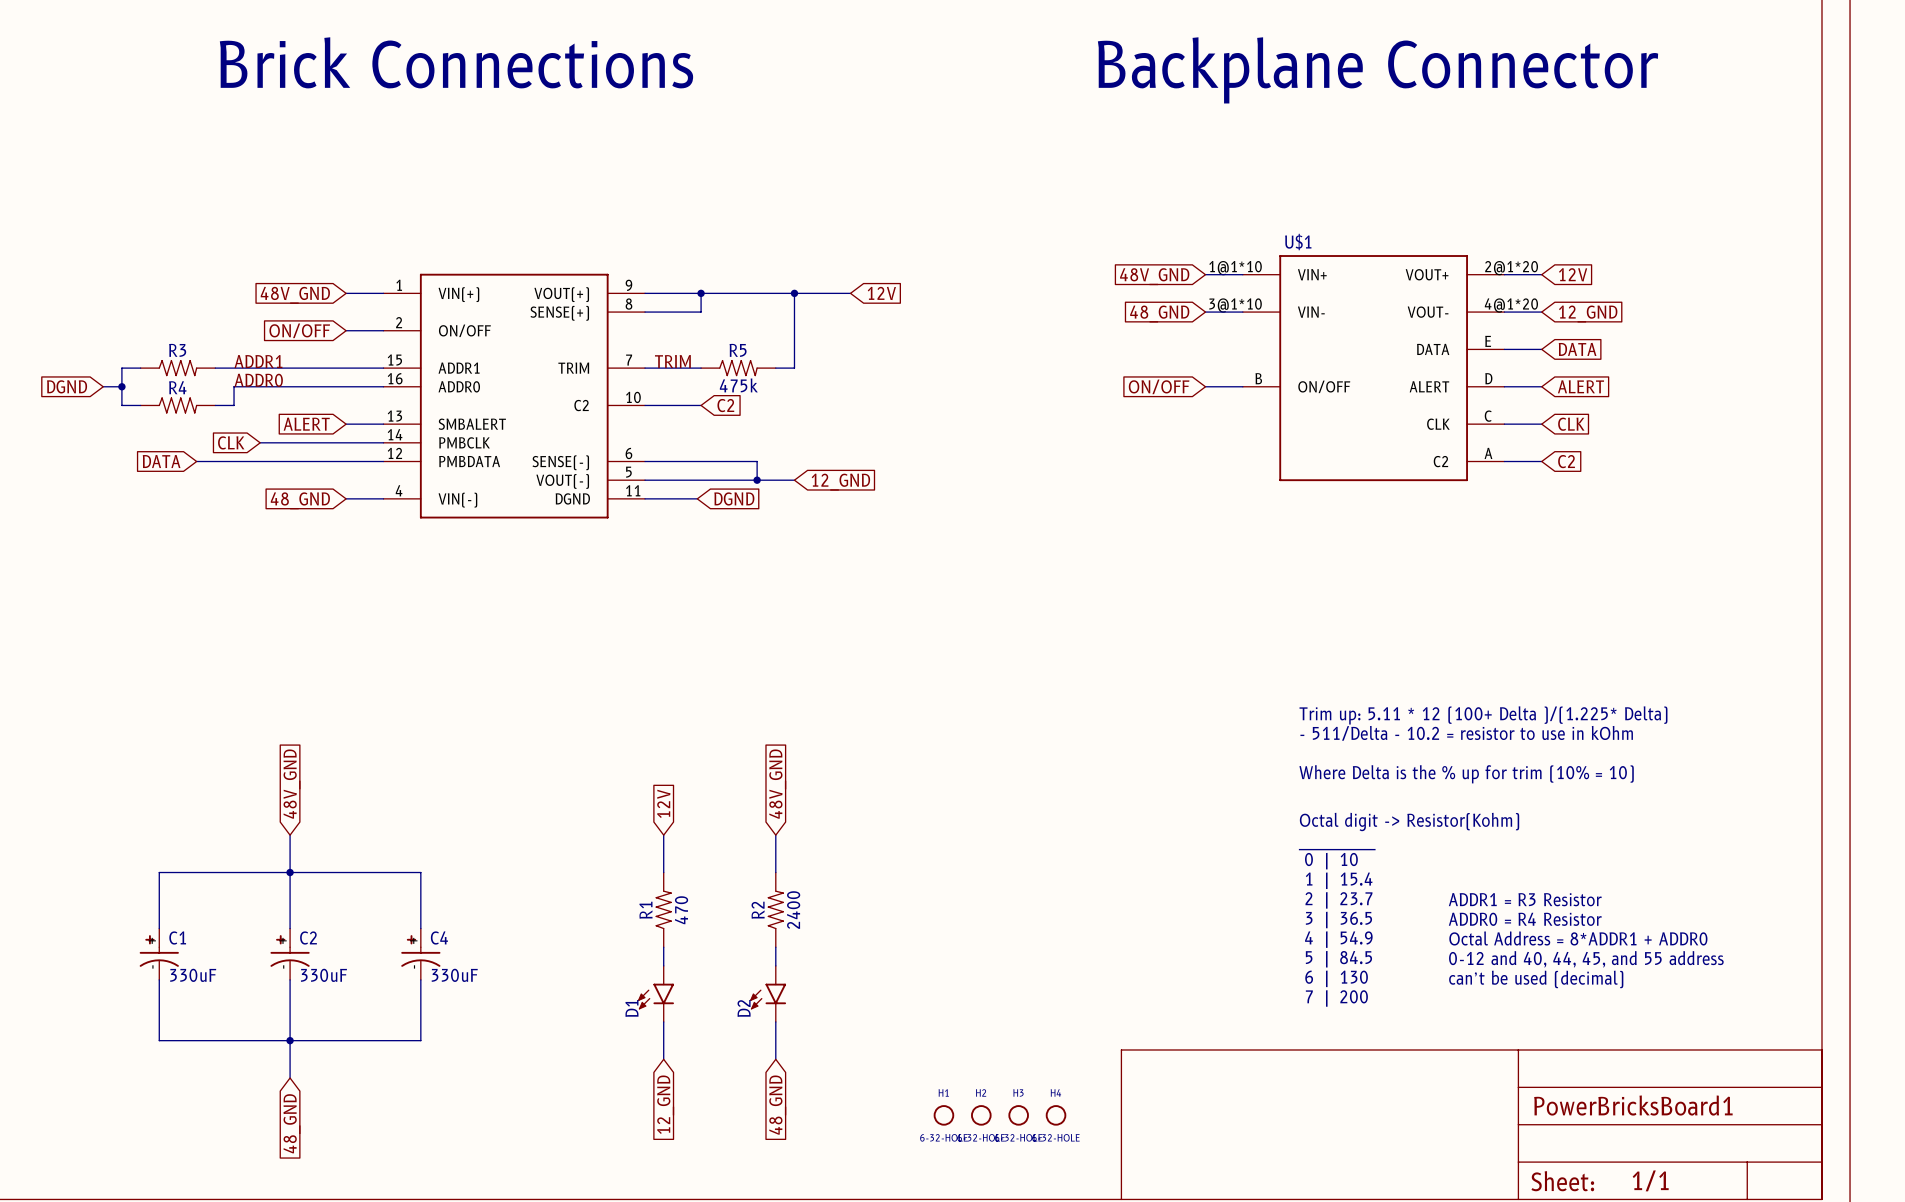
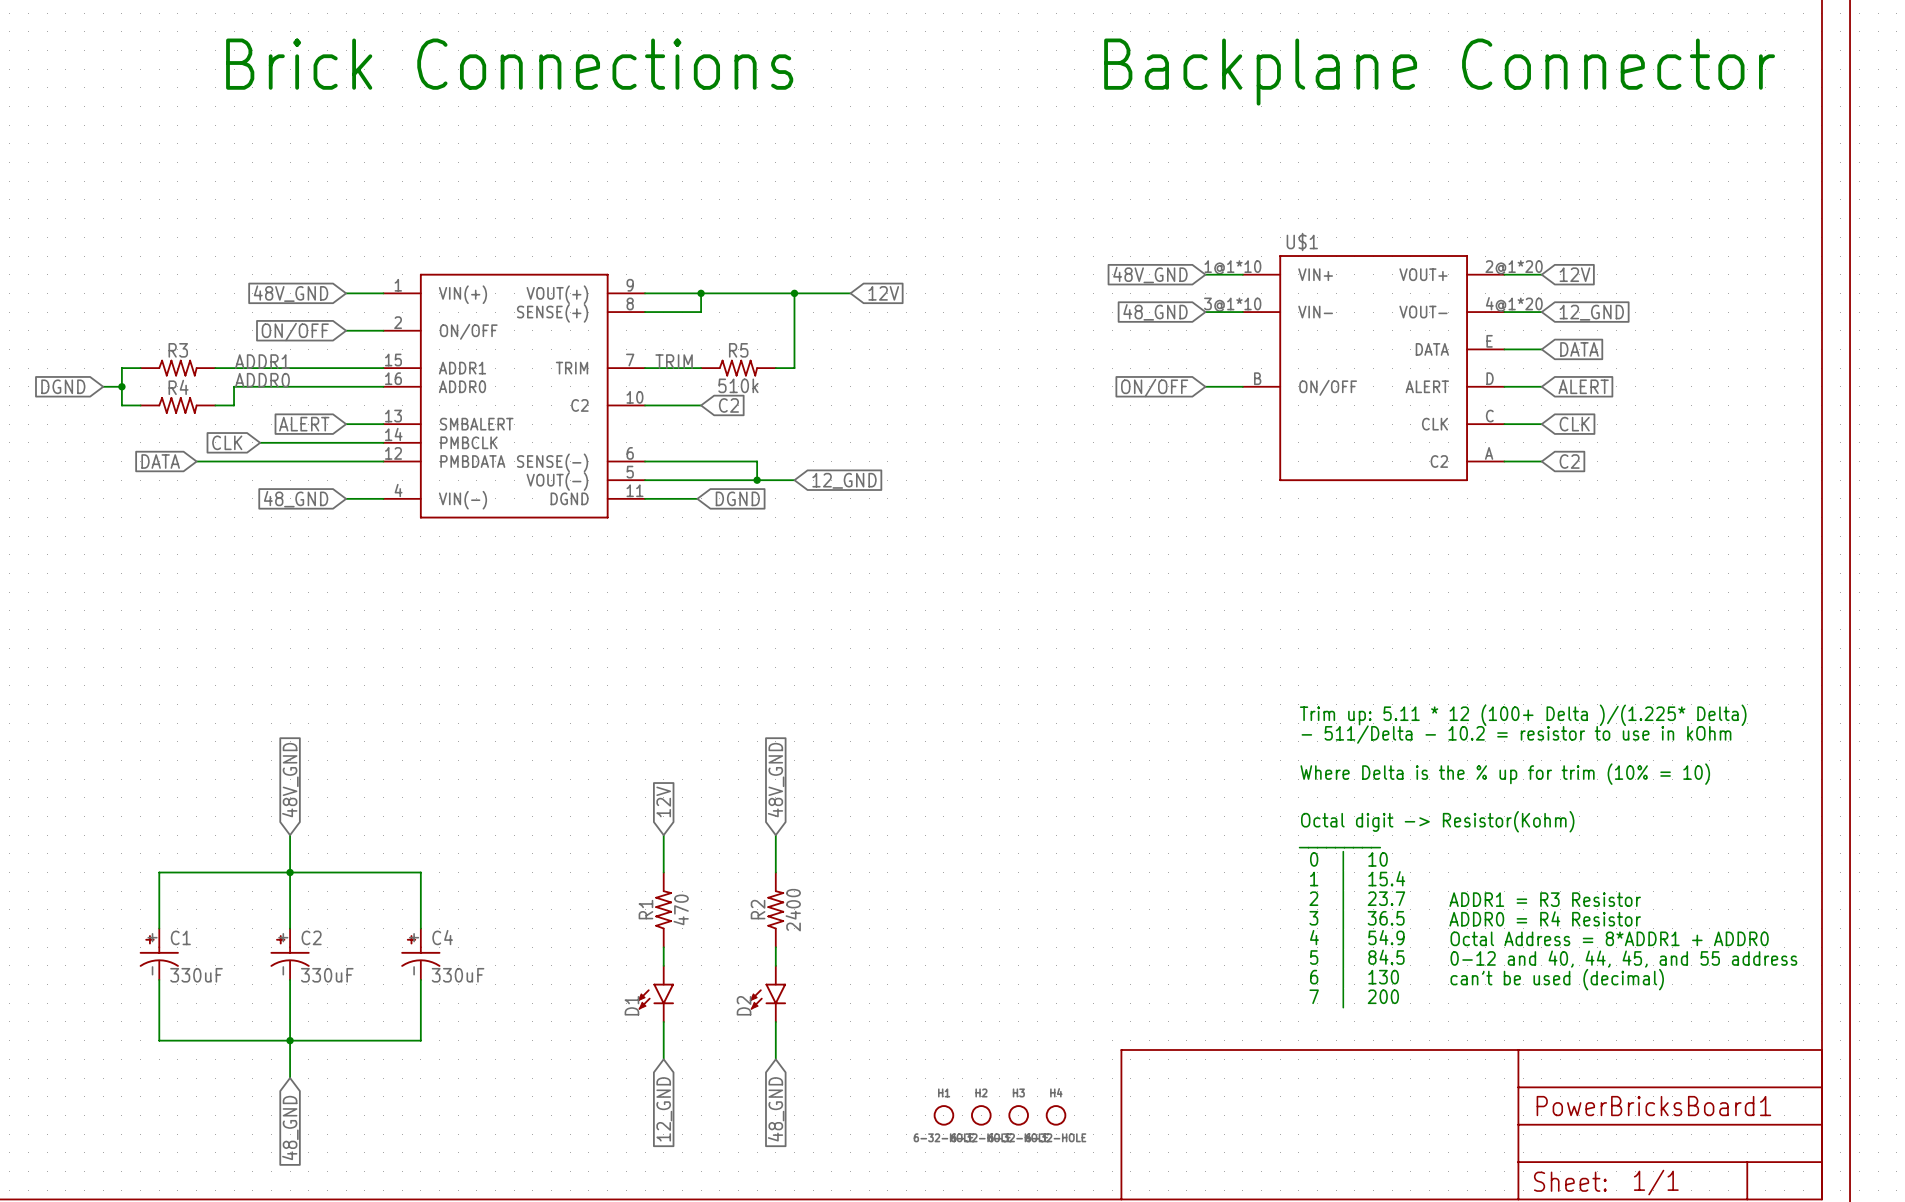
R5 value: 475k (738, 385) -> 510k (738, 385)

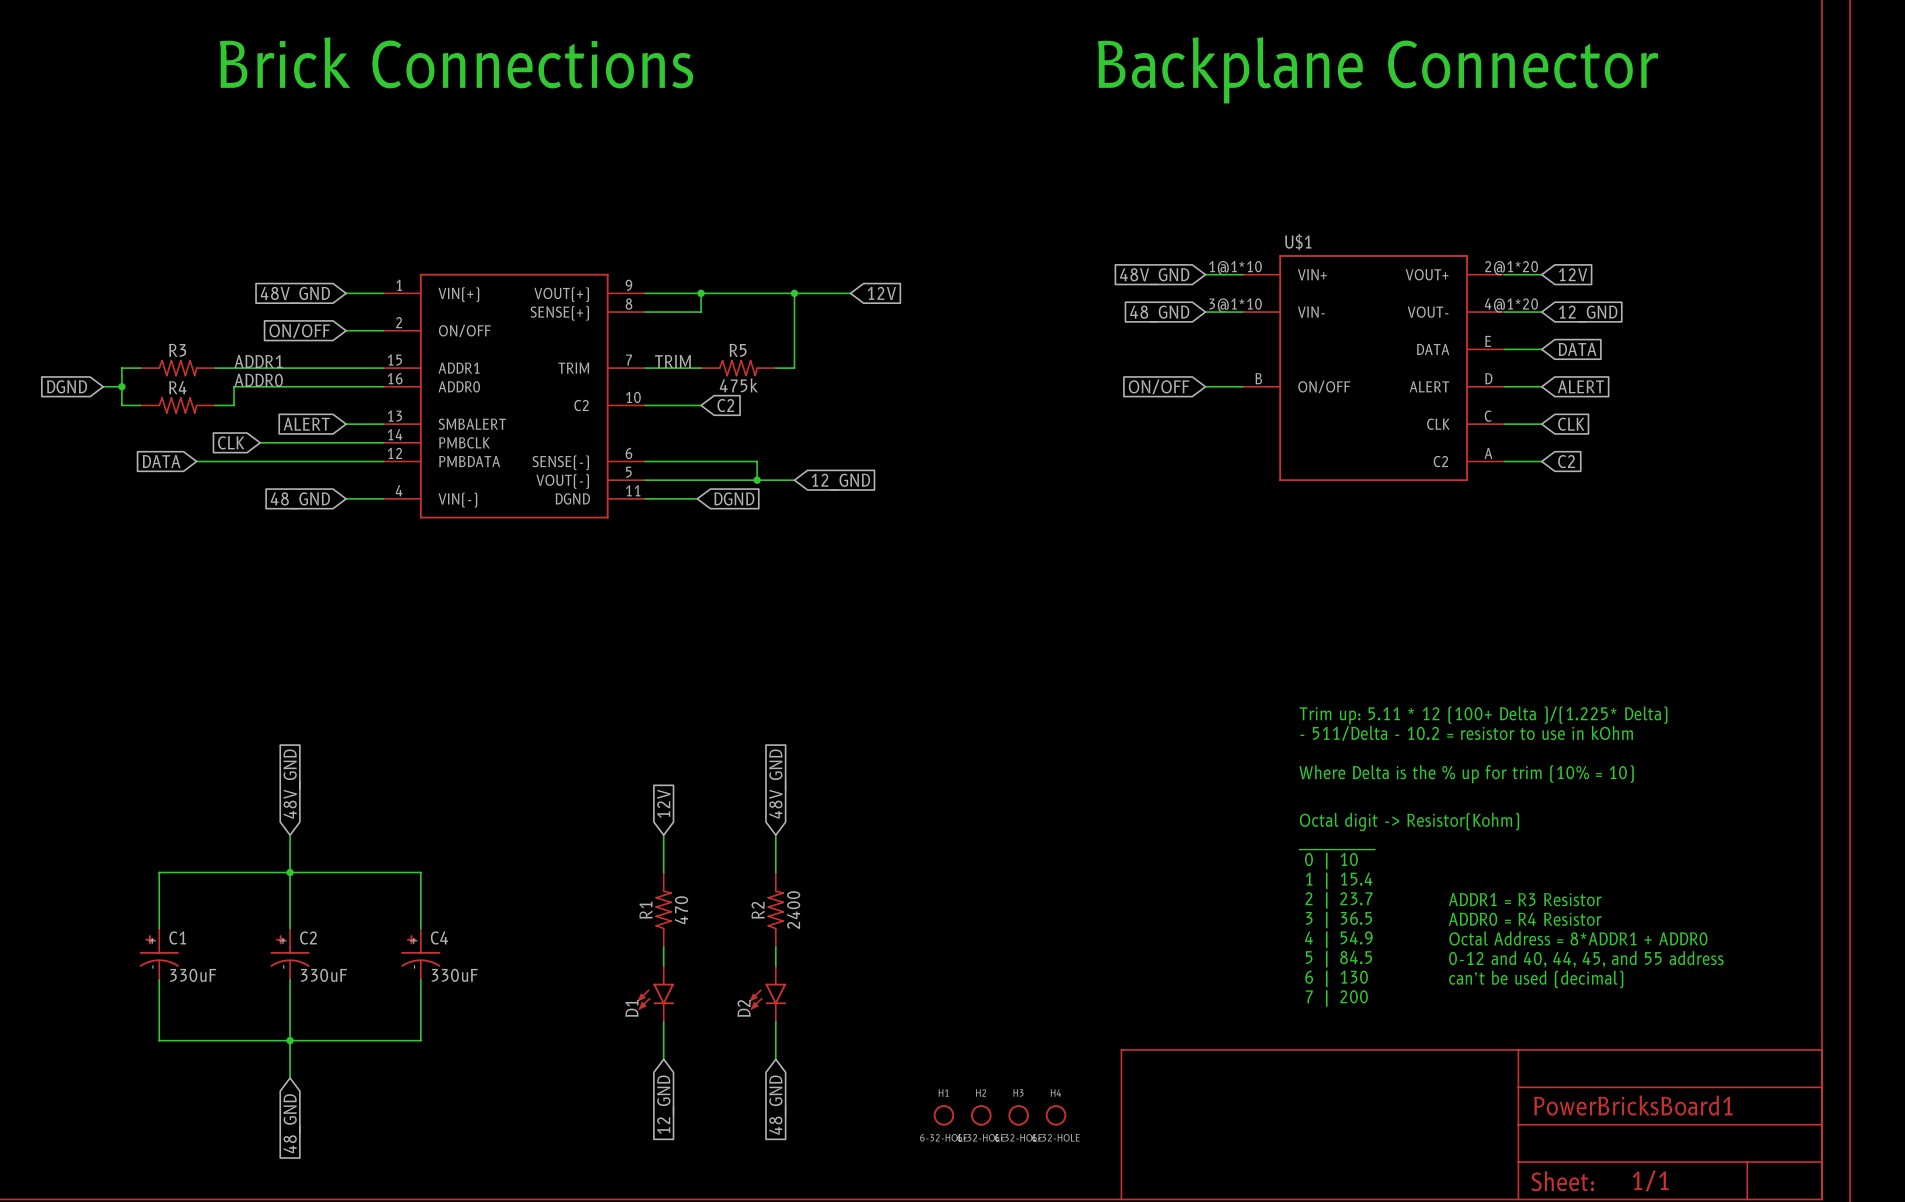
R5 value: 510k (738, 385) -> 475k (738, 385)

